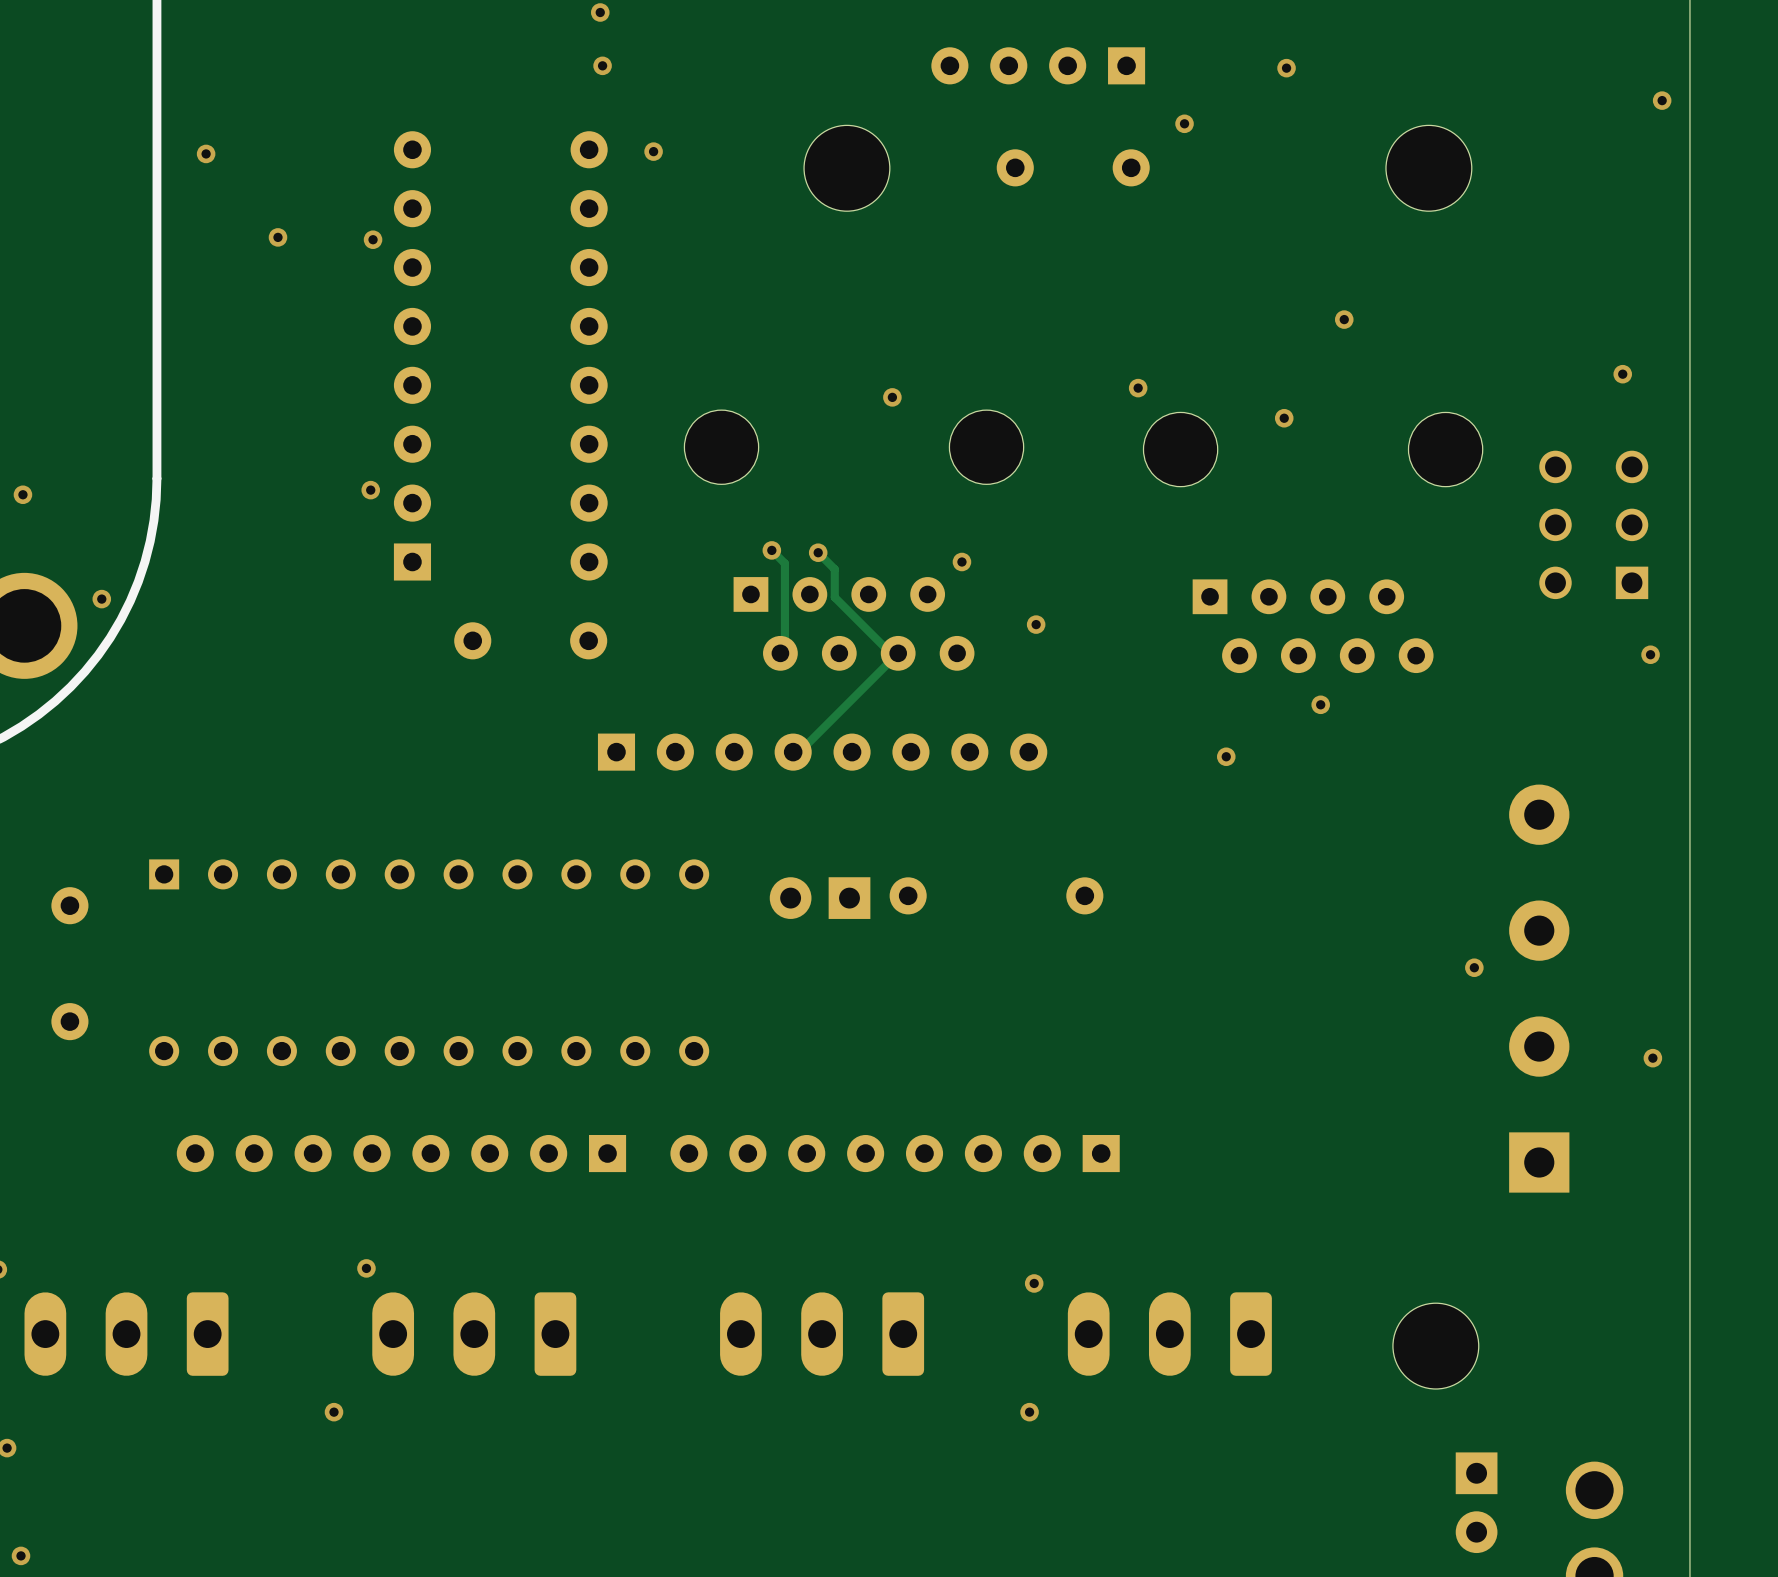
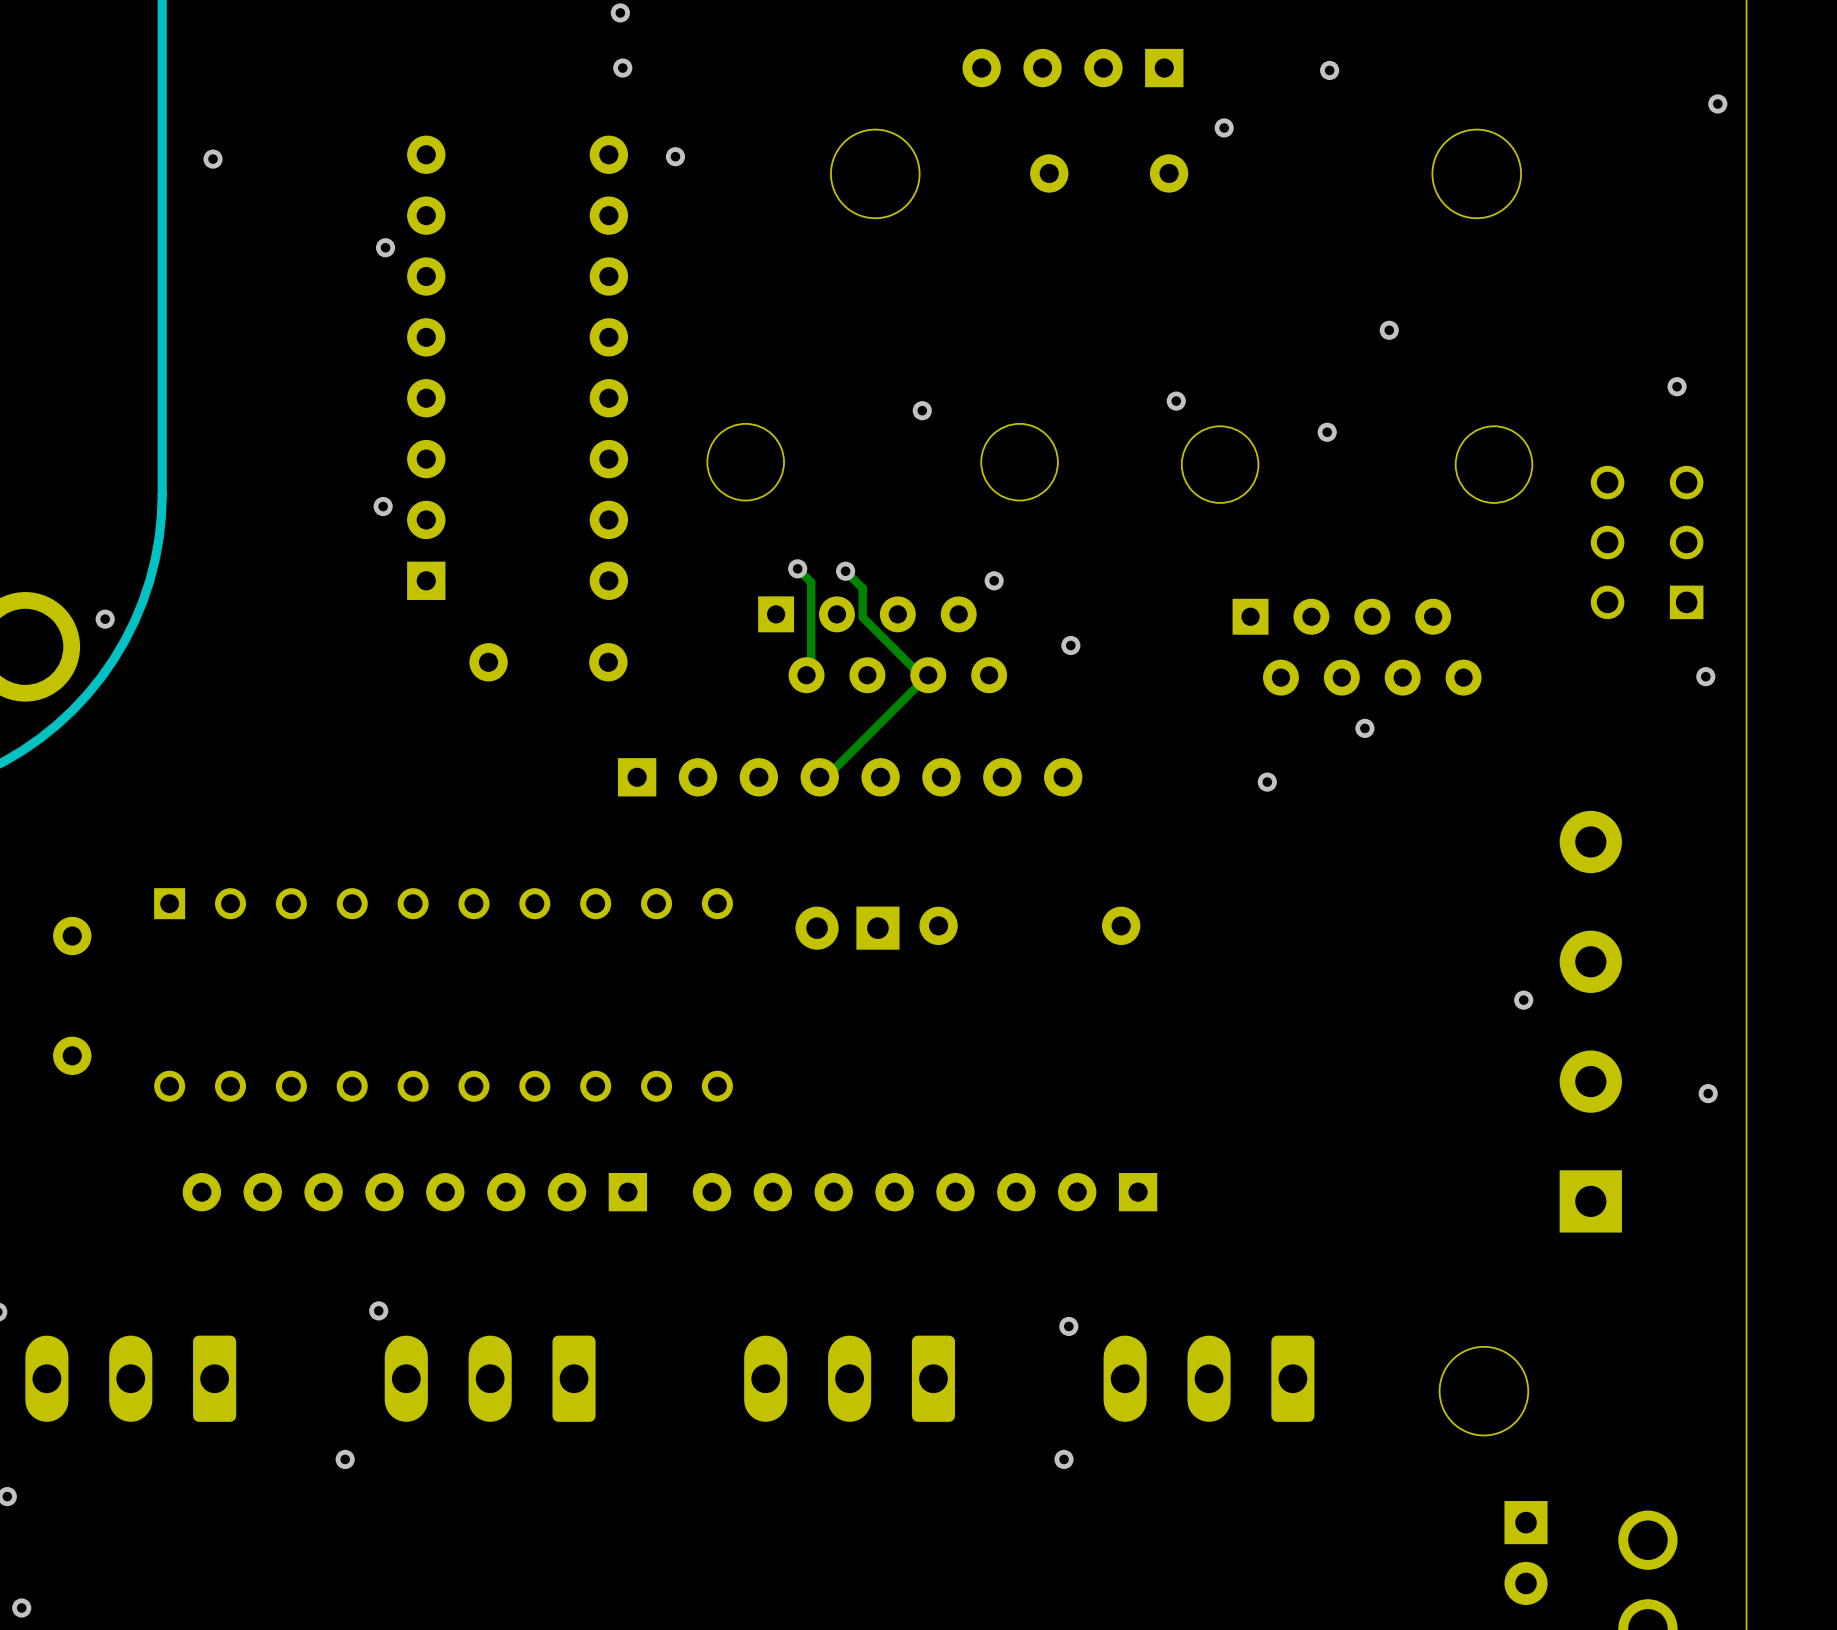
via: (277, 237) -> none
via: (22, 494) -> none

